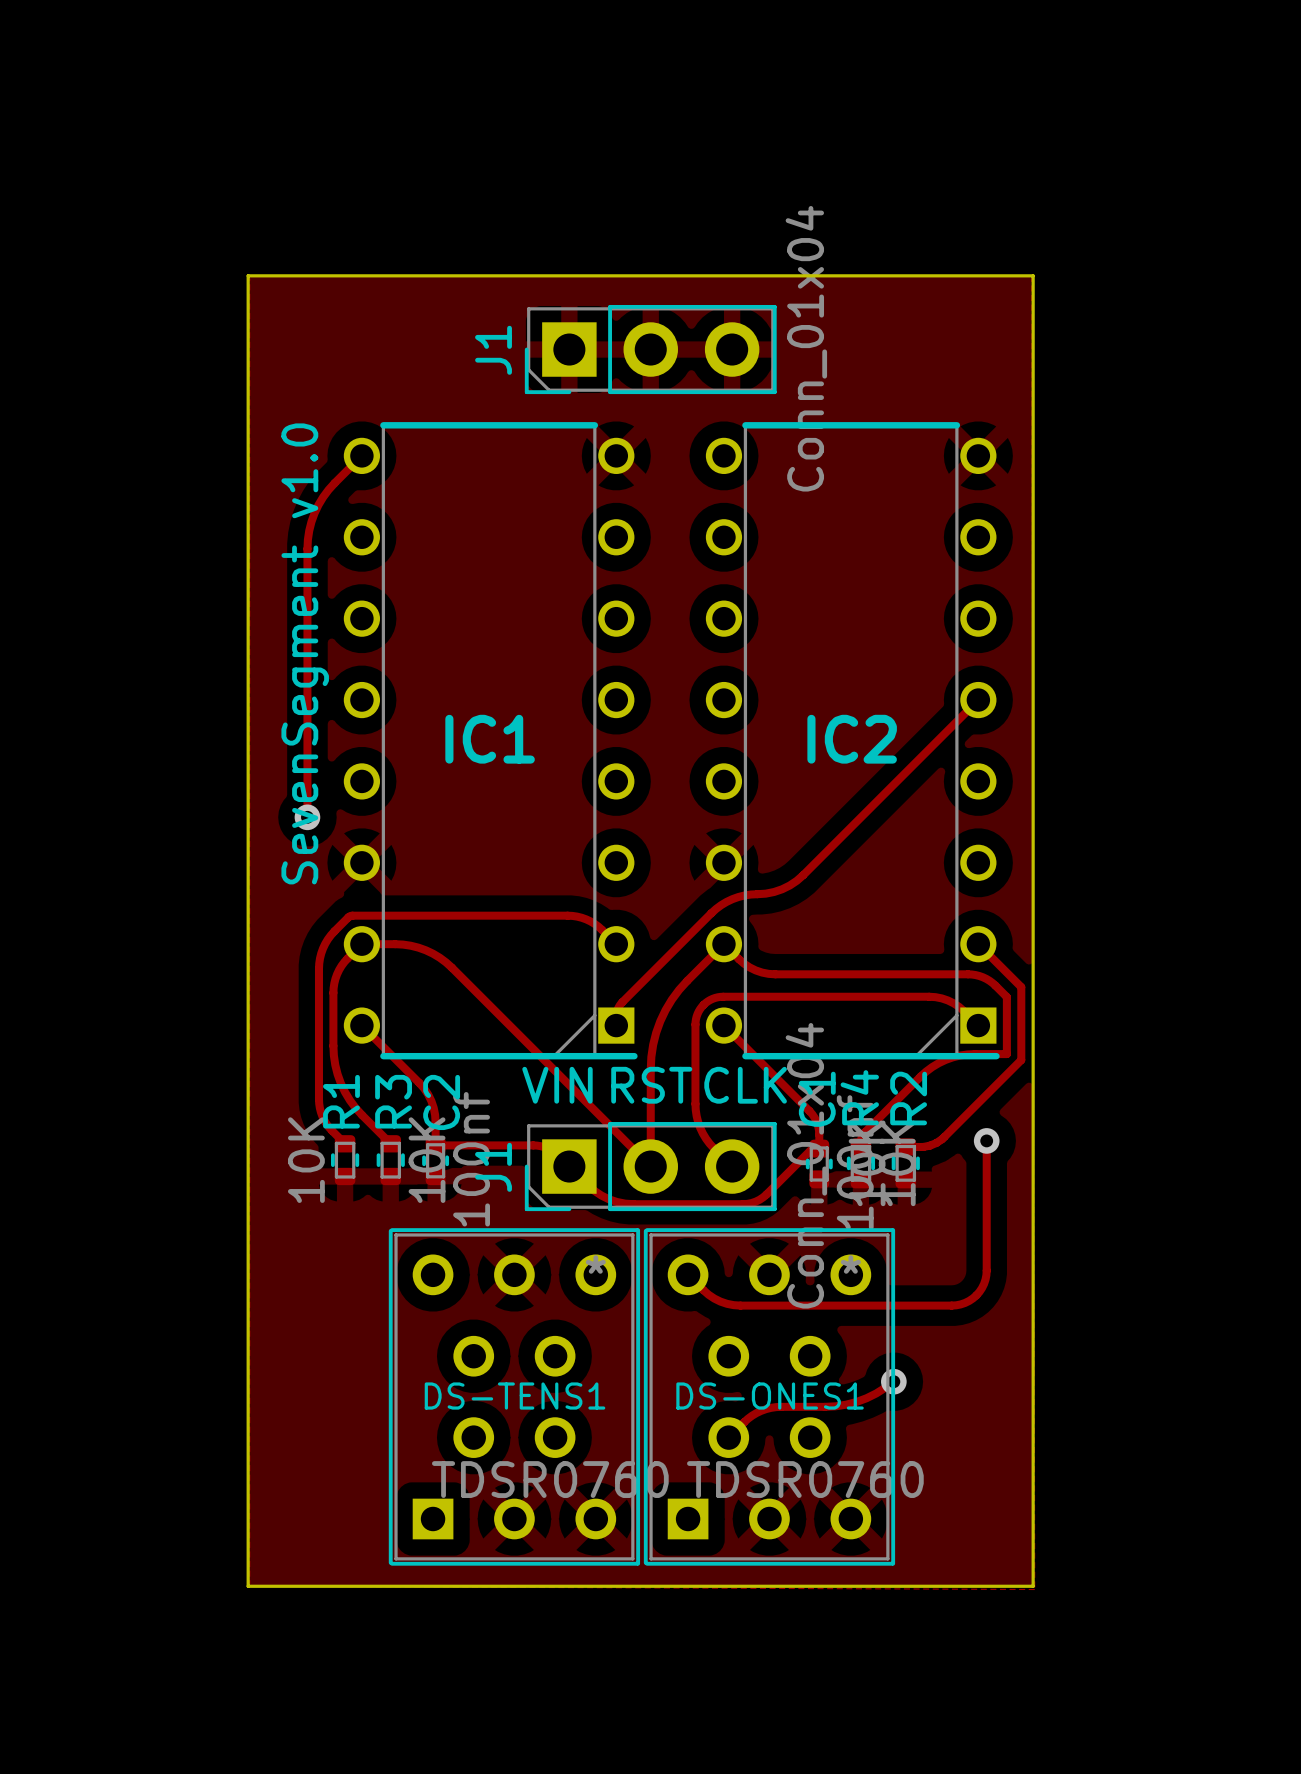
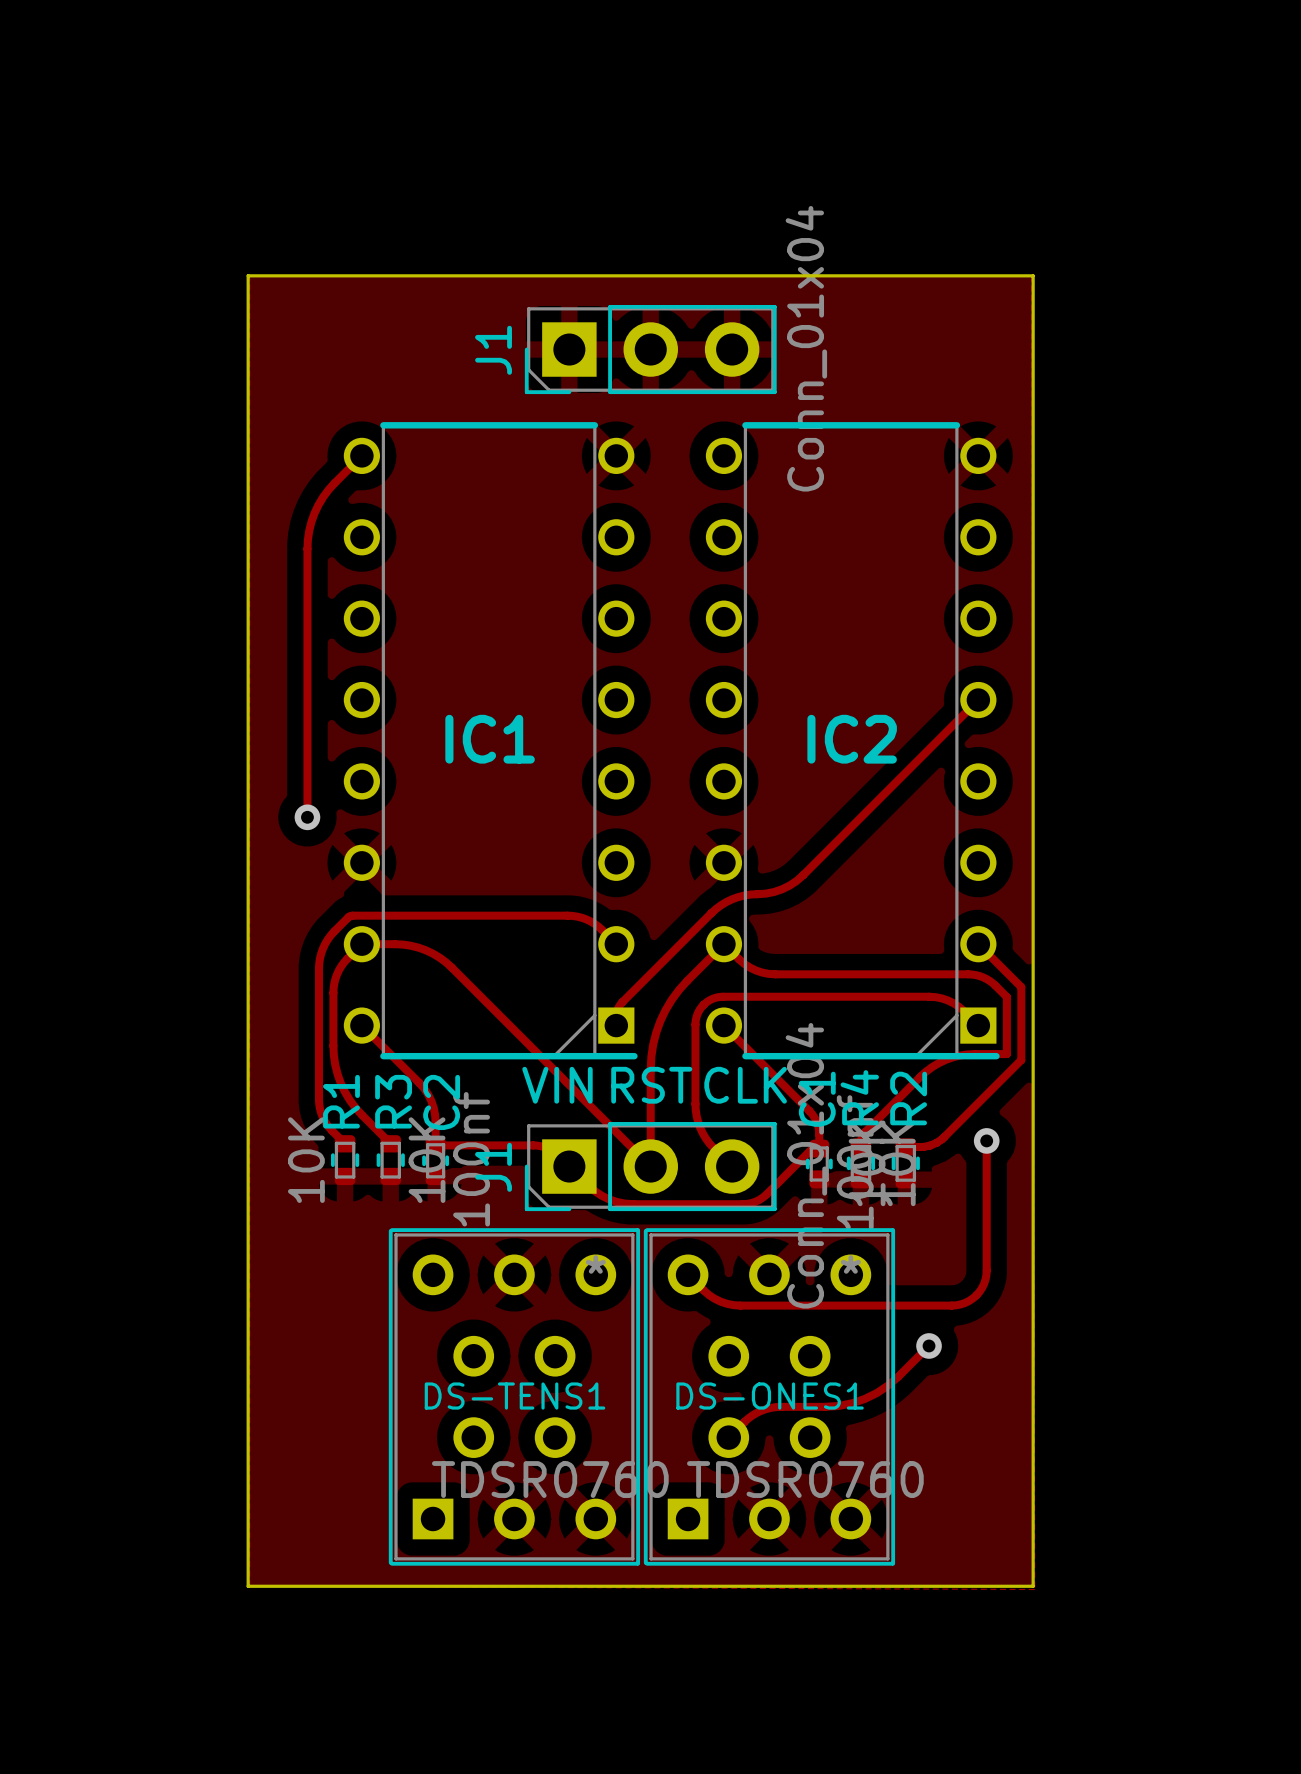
text: SevenSegment v1.0 (305, 653) -> none
track: (893, 1381) (876, 1393) (856, 1401) (824, 1406) -> (929, 1345) (898, 1376) (877, 1392) (852, 1403) (825, 1406)
via position: (893, 1381) -> (929, 1345)

